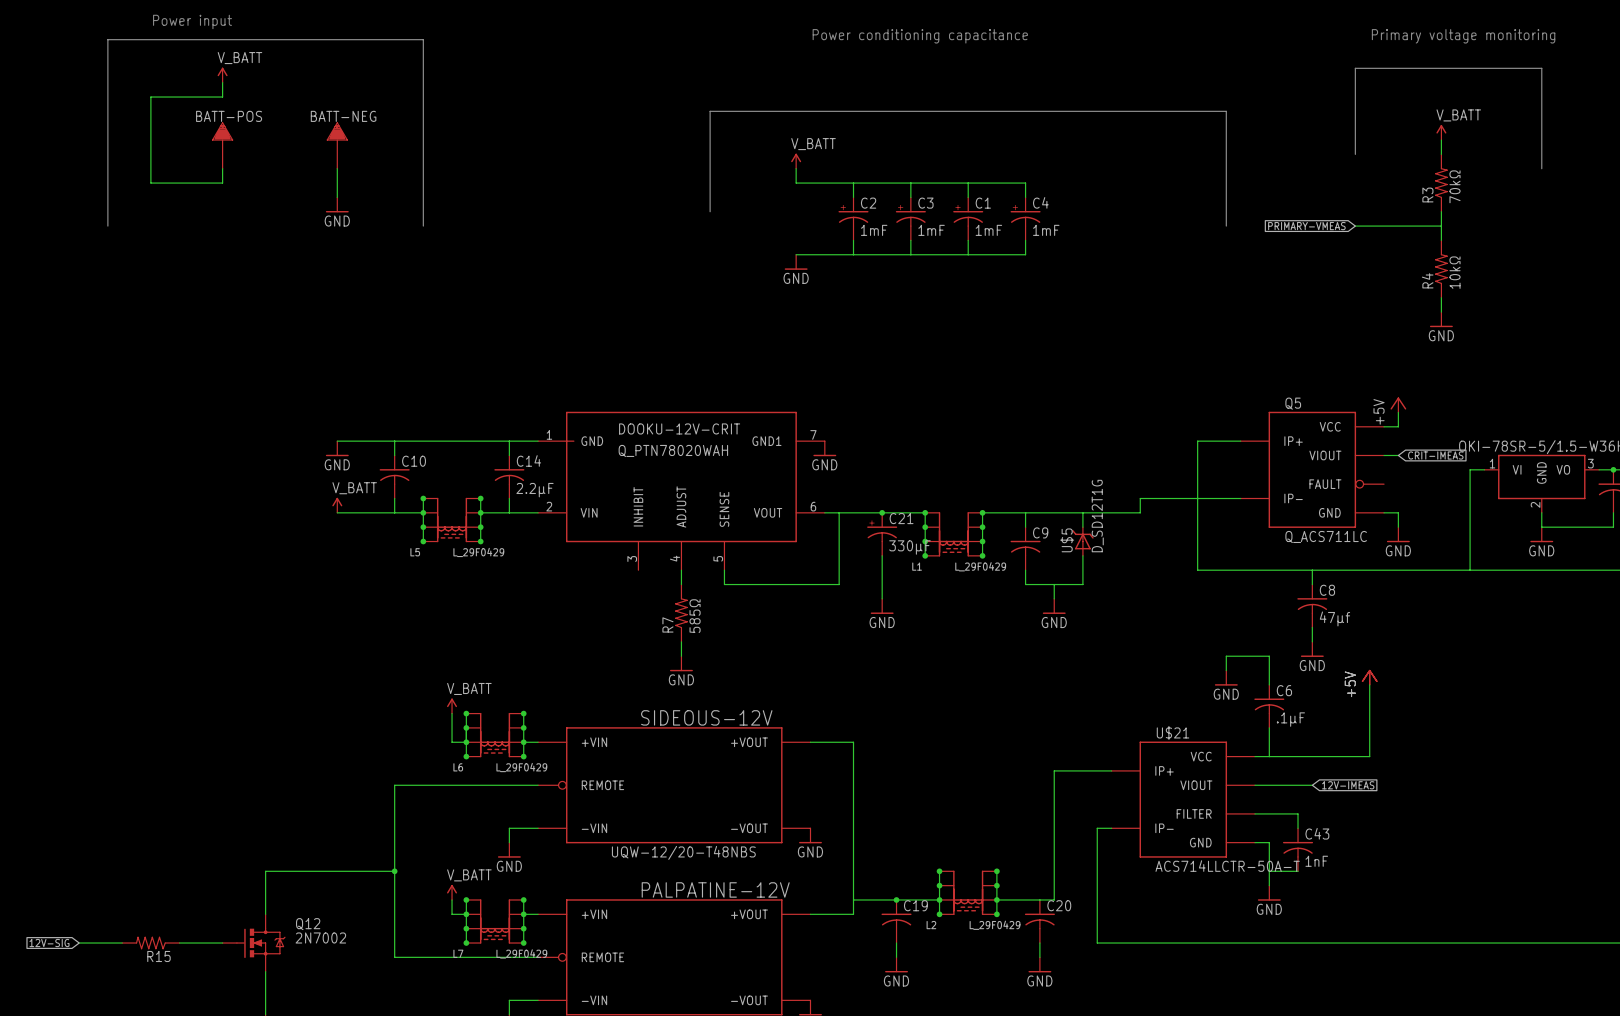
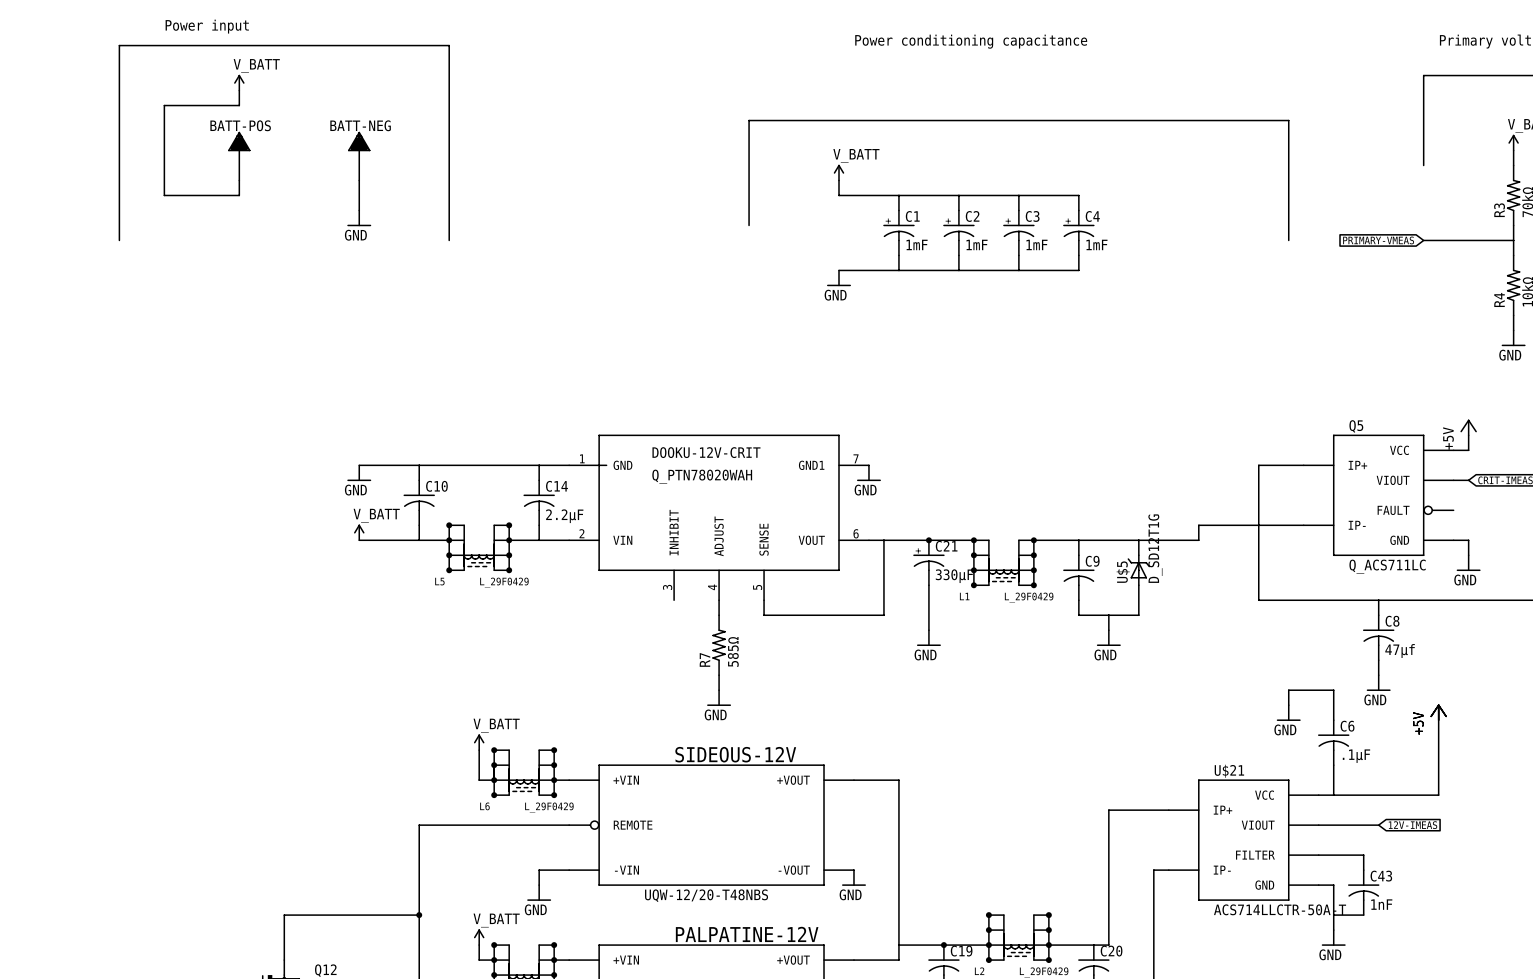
C2 name: C2 (868, 203) -> C1 (912, 216)
C3 name: C3 (925, 203) -> C2 (972, 216)
C1 name: C1 (983, 203) -> C3 (1032, 216)

